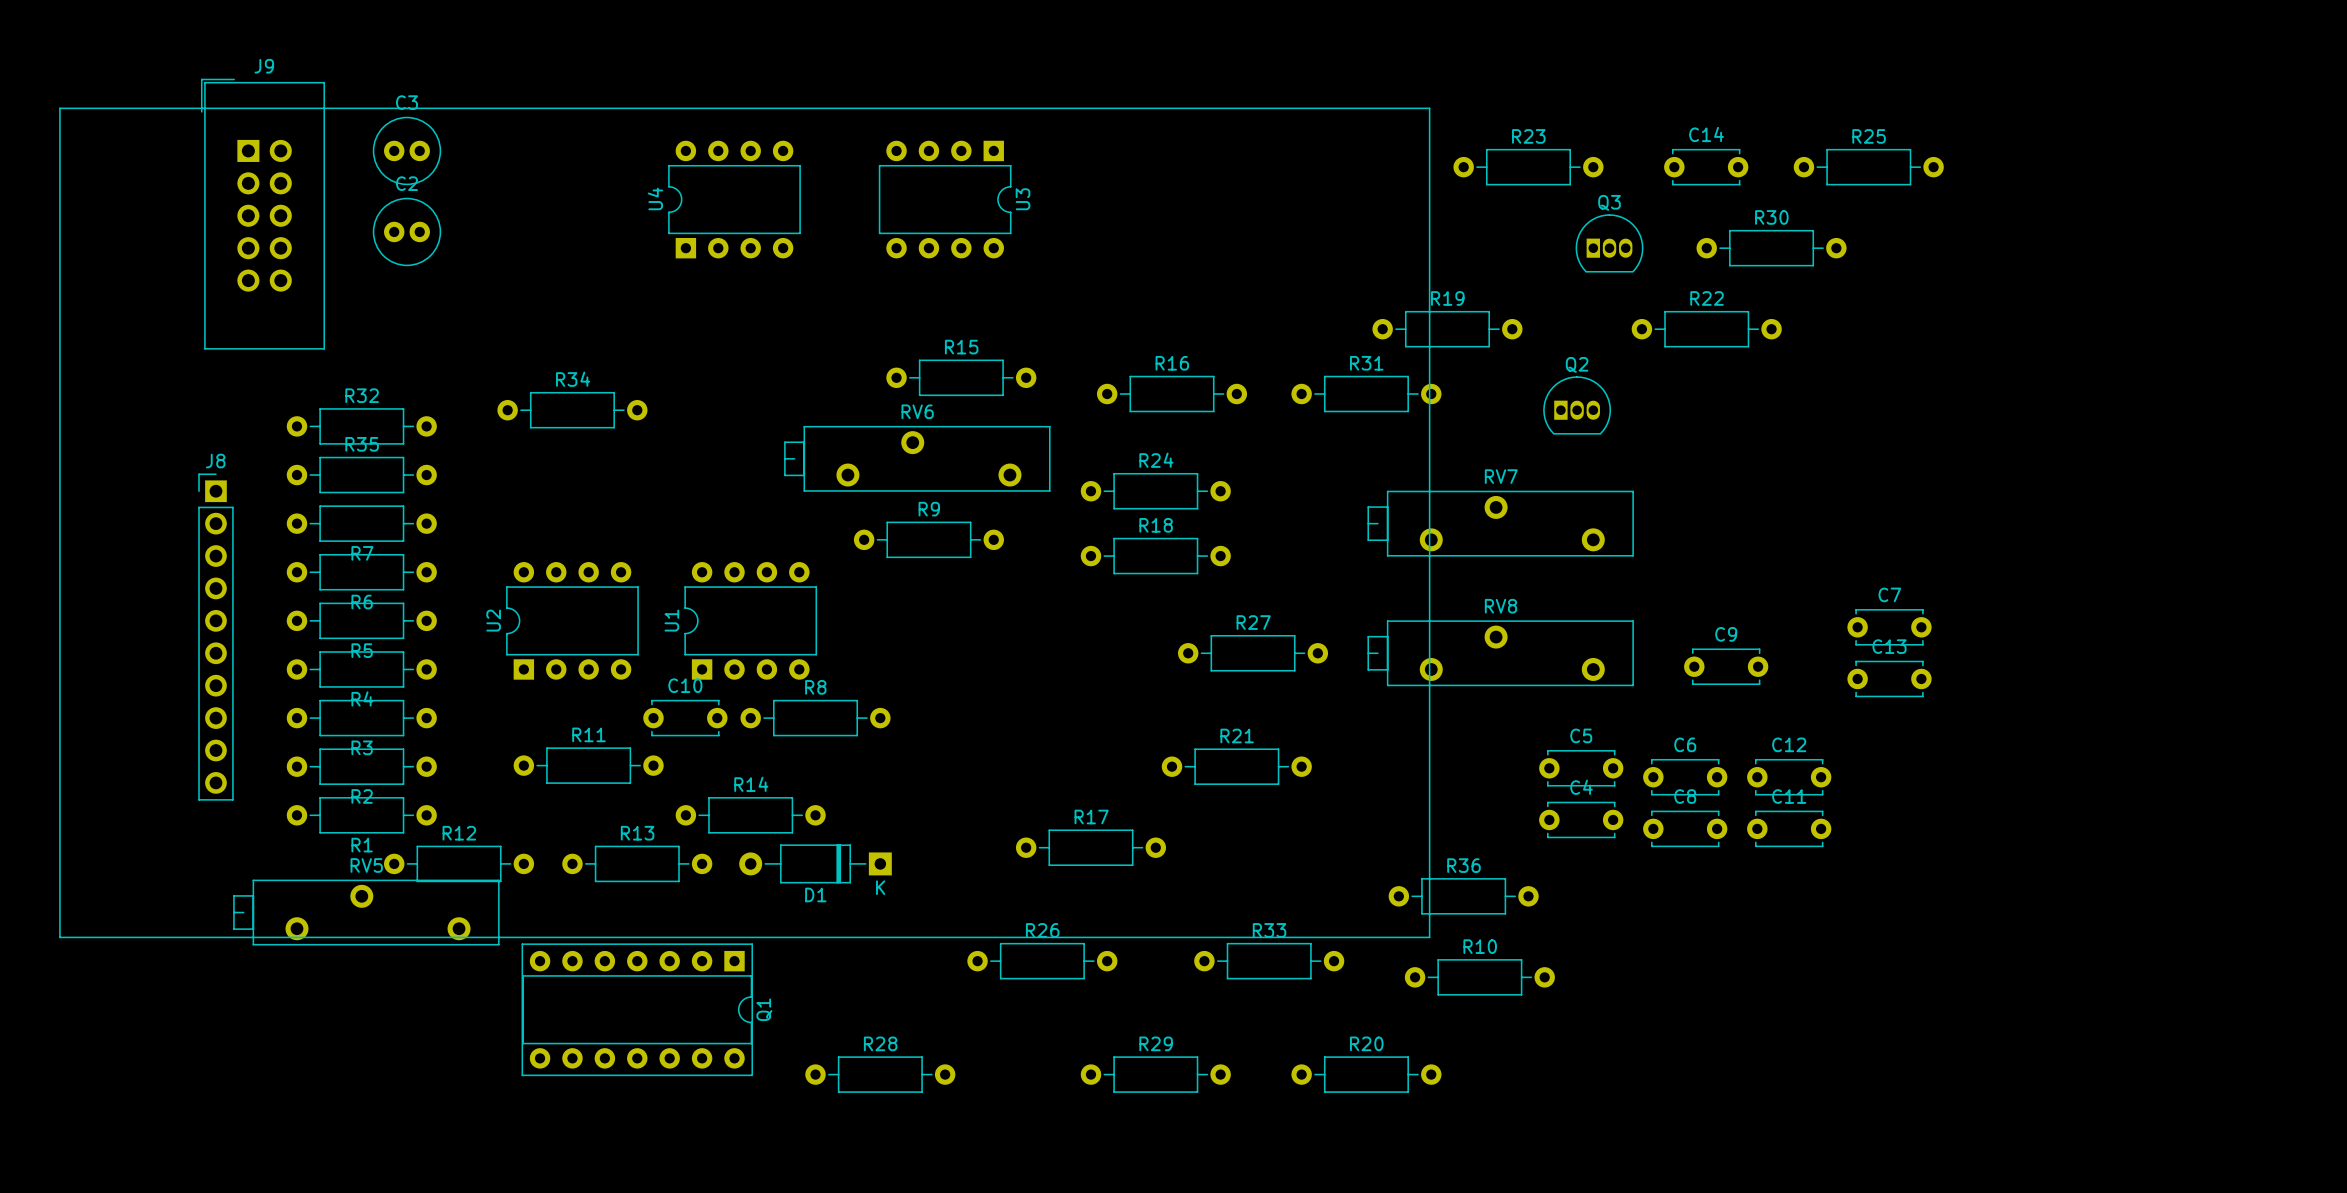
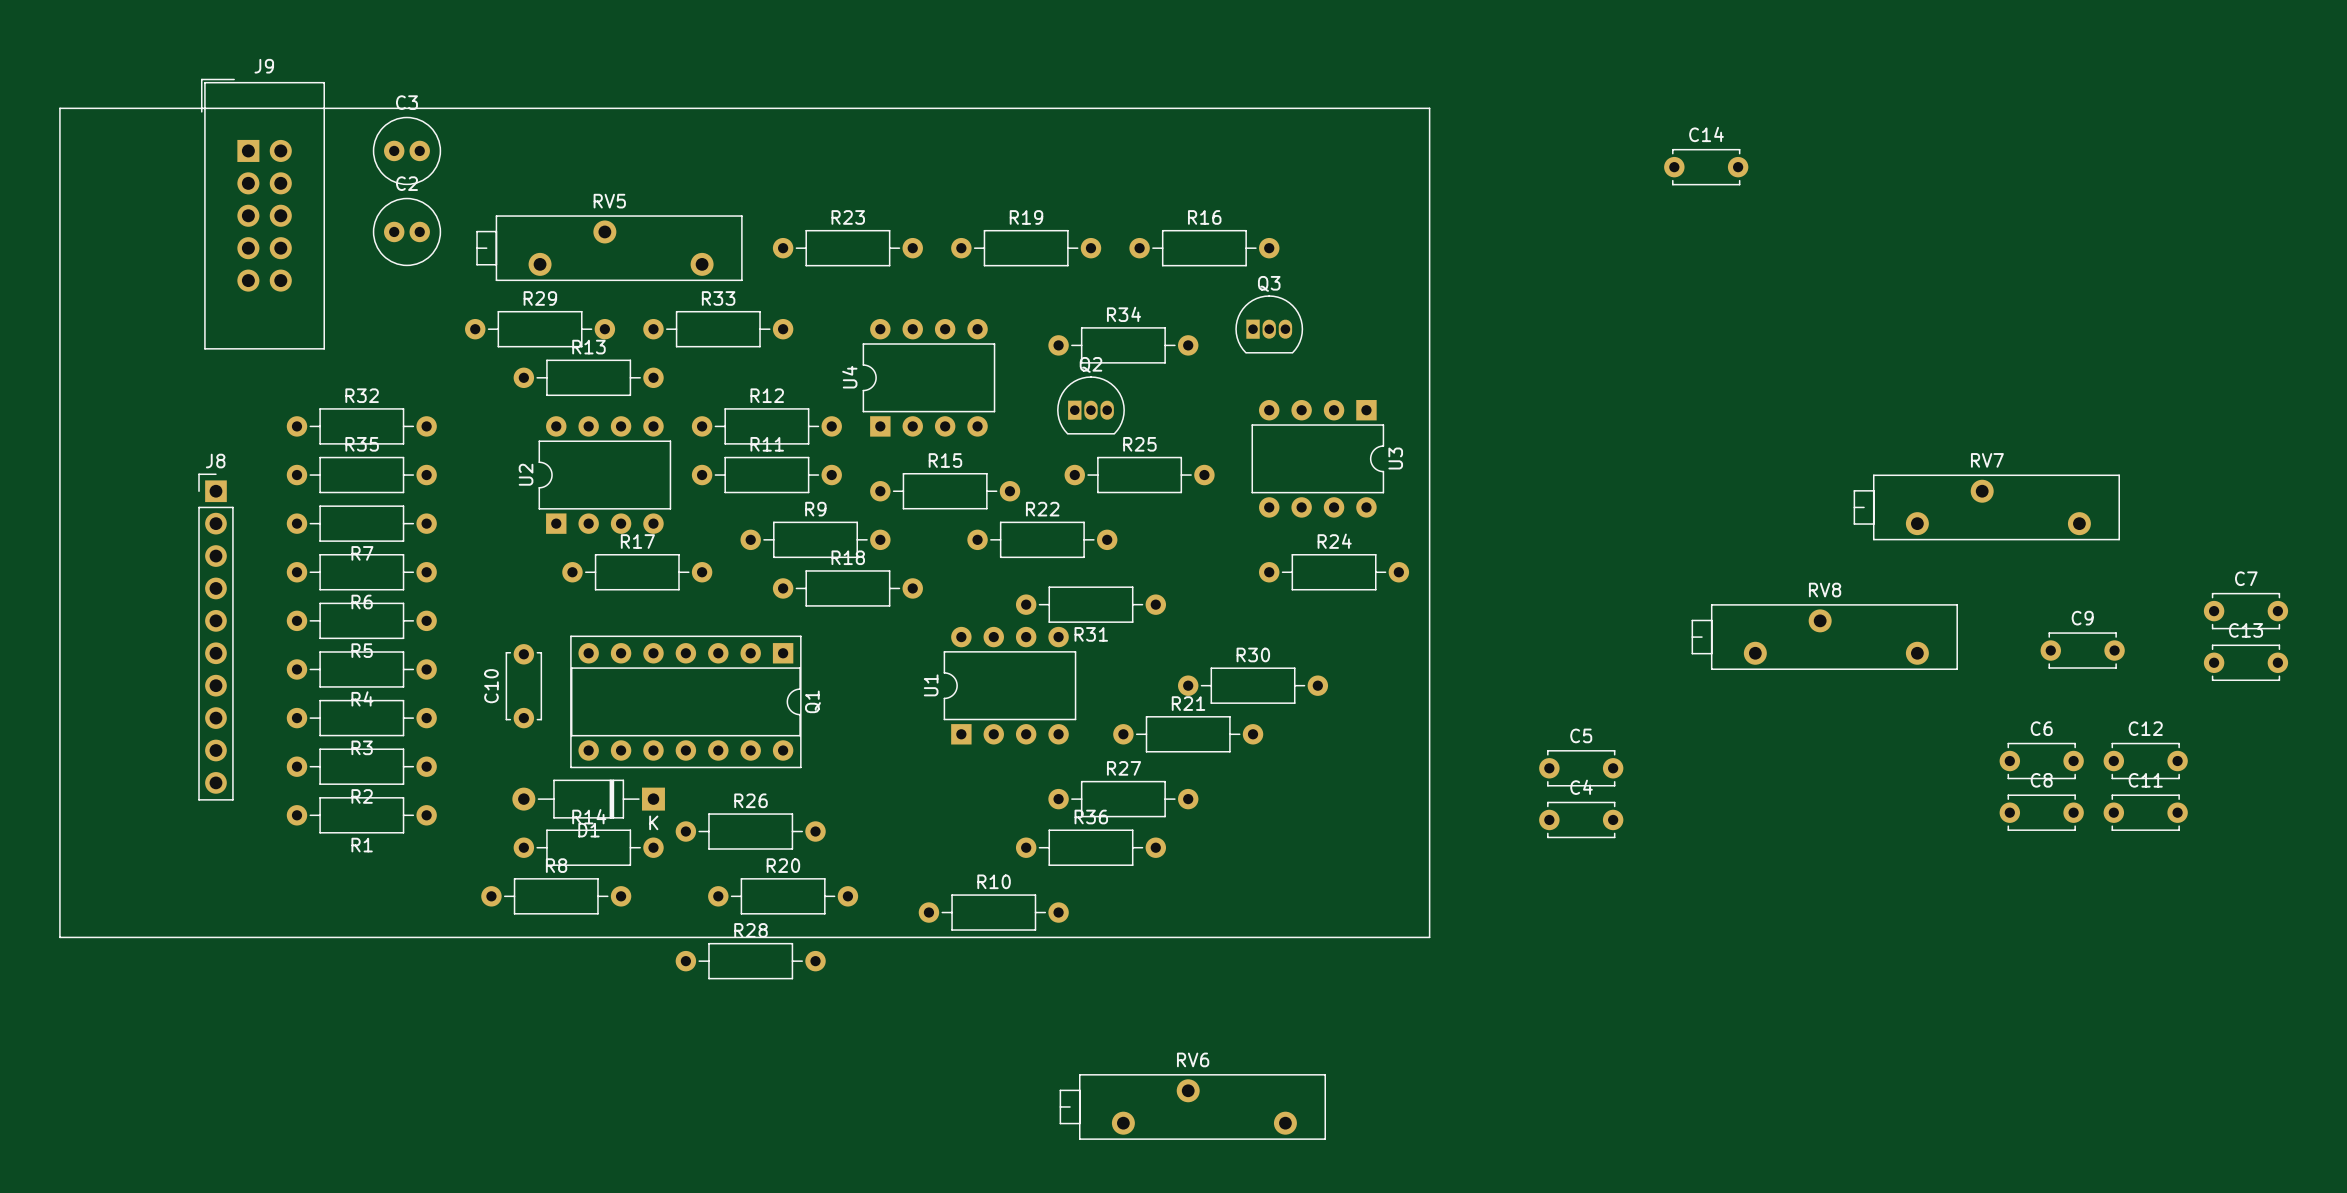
R23 position: (1528, 167) -> (847, 248)
R25 position: (1868, 167) -> (1139, 475)
U4 position: (734, 199) -> (928, 377)
U3 position: (945, 199) -> (1317, 458)
Q3 position: (1609, 243) -> (1269, 324)
R30 position: (1771, 248) -> (1253, 685)
R19 position: (1447, 329) -> (1026, 248)
R22 position: (1706, 329) -> (1042, 539)
R31 name position: R31 (1366, 363) -> R31 (1091, 634)
R15 position: (961, 377) -> (945, 491)
R16 position: (1172, 394) -> (1204, 248)
R31 position: (1366, 394) -> (1090, 604)
Q2 position: (1577, 405) -> (1090, 405)
R34 position: (572, 410) -> (1123, 345)
RV6 position: (917, 458) -> (1192, 1106)
R24 position: (1155, 491) -> (1334, 572)
RV7 position: (1500, 523) -> (1986, 507)
R9 position: (928, 539) -> (815, 539)
R18 position: (1155, 556) -> (847, 588)
R17: none -> (637, 572)
U2 position: (572, 620) -> (604, 475)
U1 position: (750, 620) -> (1009, 685)
C7 position: (1889, 627) -> (2245, 611)
R27 position: (1253, 653) -> (1123, 799)
RV8 position: (1500, 653) -> (1824, 637)
C9 position: (1726, 666) -> (2082, 650)
C13 position: (1889, 678) -> (2245, 662)
C10 name position: C10 (685, 685) -> C10 (491, 686)
C10 rotation: 0° (685, 718) -> 90° clockwise (523, 686)
C10 position: (685, 718) -> (523, 686)
R8 position: (815, 718) -> (556, 896)
R11 position: (588, 765) -> (766, 475)
R21 position: (1236, 766) -> (1188, 734)
C6 position: (1685, 777) -> (2041, 761)
C12 position: (1789, 777) -> (2145, 761)
R14 position: (750, 815) -> (588, 847)
R17 name: R17 (1091, 817) -> R36 (1091, 817)
C8 position: (1685, 828) -> (2041, 812)
C11 position: (1789, 828) -> (2145, 812)
R12 position: (459, 863) -> (766, 426)
R13 position: (637, 863) -> (588, 377)
D1 position: (815, 863) -> (588, 799)
R36: (1463, 896) -> none
RV5 position: (366, 912) -> (609, 248)
R26 position: (1042, 961) -> (750, 831)
R33 position: (1269, 961) -> (718, 329)
R10 position: (1479, 977) -> (993, 912)
Q1 position: (637, 1009) -> (685, 701)
R28 position: (880, 1074) -> (750, 961)
R29 position: (1155, 1074) -> (540, 329)
R20 position: (1366, 1074) -> (783, 896)

